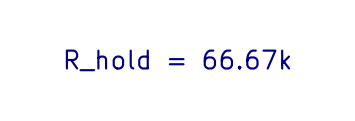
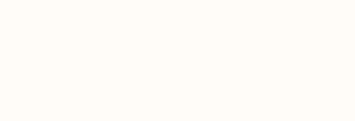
text: R_hold = 66.67k (177, 60) -> none

